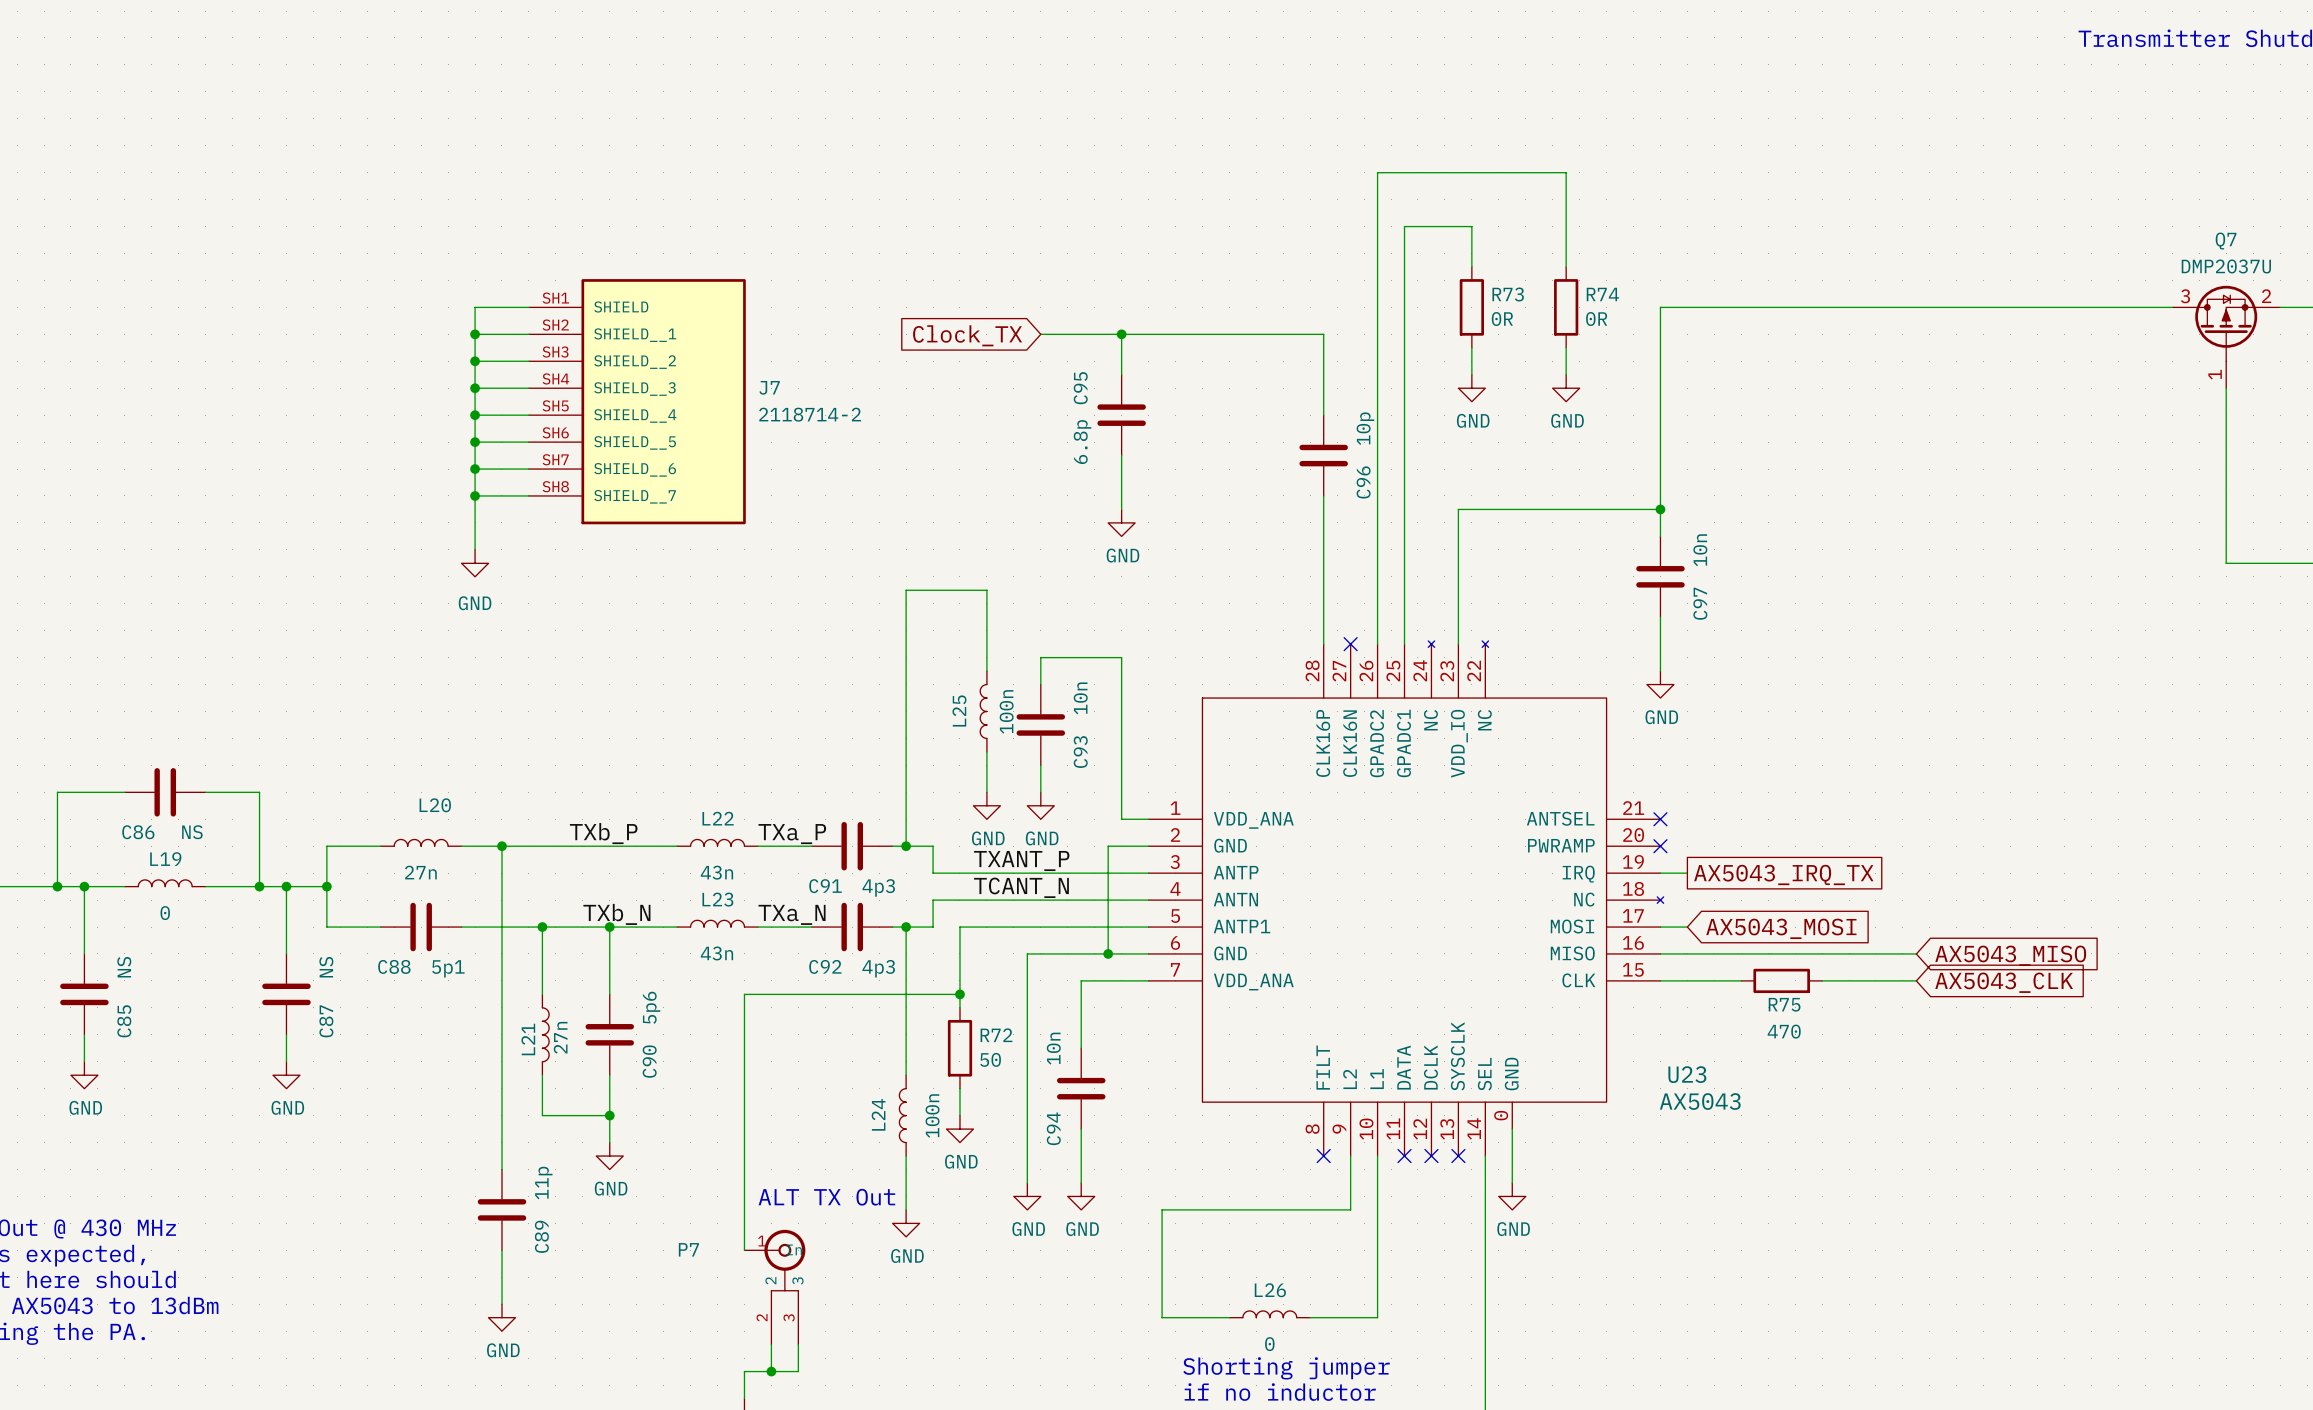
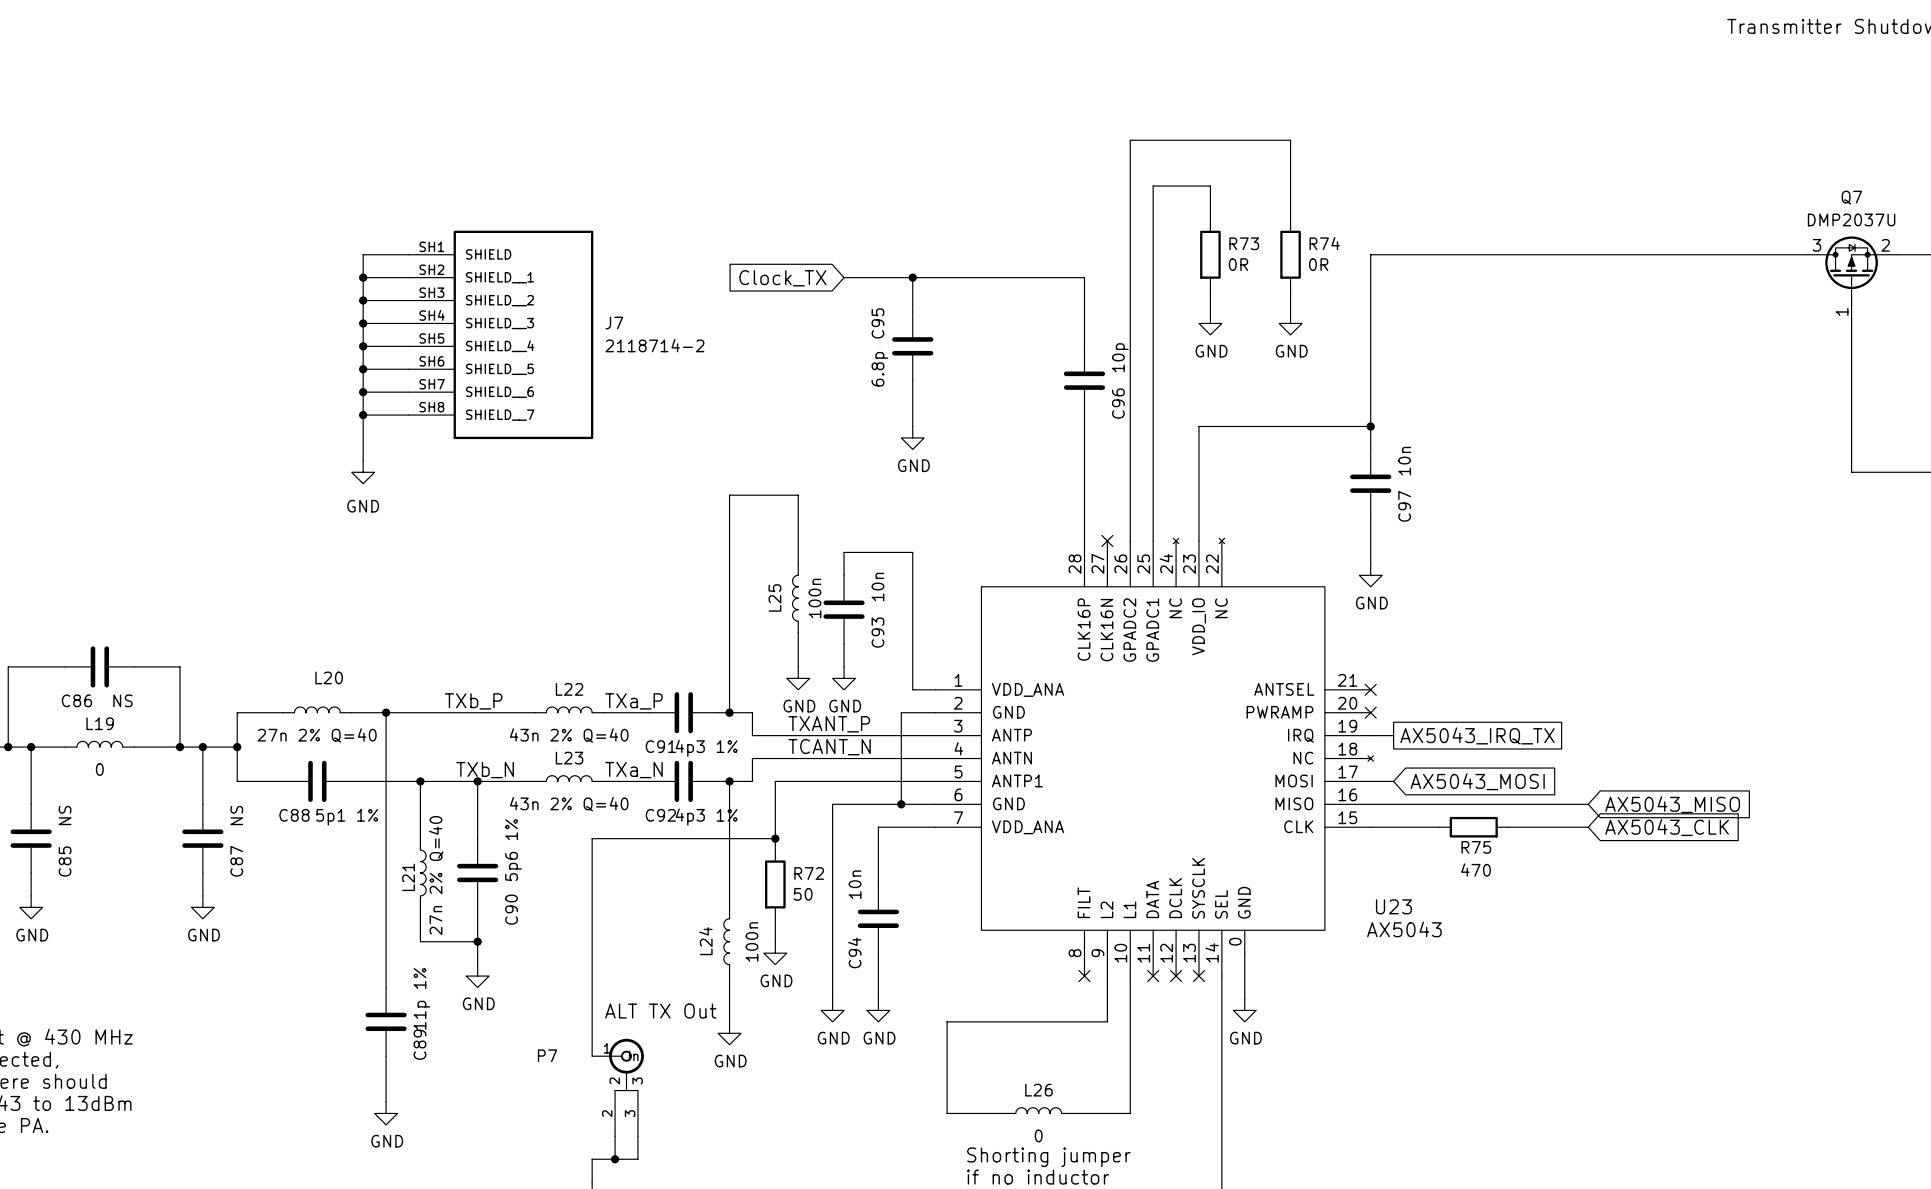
L20 value: 27n (420, 872) -> 27n 2% Q=40 (317, 735)
L22 value: 43n (716, 872) -> 43n 2% Q=40 (569, 735)
C91 value: 4p3 (878, 887) -> 4p3 1% (706, 748)
L23 value: 43n (716, 953) -> 43n 2% Q=40 (569, 804)
C88 value: 5p1 (448, 968) -> 5p1 1% (347, 817)
C92 value: 4p3 (878, 968) -> 4p3 1% (706, 816)
C90 value: 5p6 (651, 1007) -> 5p6 1% (513, 850)
L21 value: 27n (560, 1037) -> 27n 2% Q=40 (436, 875)
C90 name position: C90 (649, 1061) -> C90 (511, 909)
C89 value: 11p (543, 1183) -> 11p 1% (421, 998)

